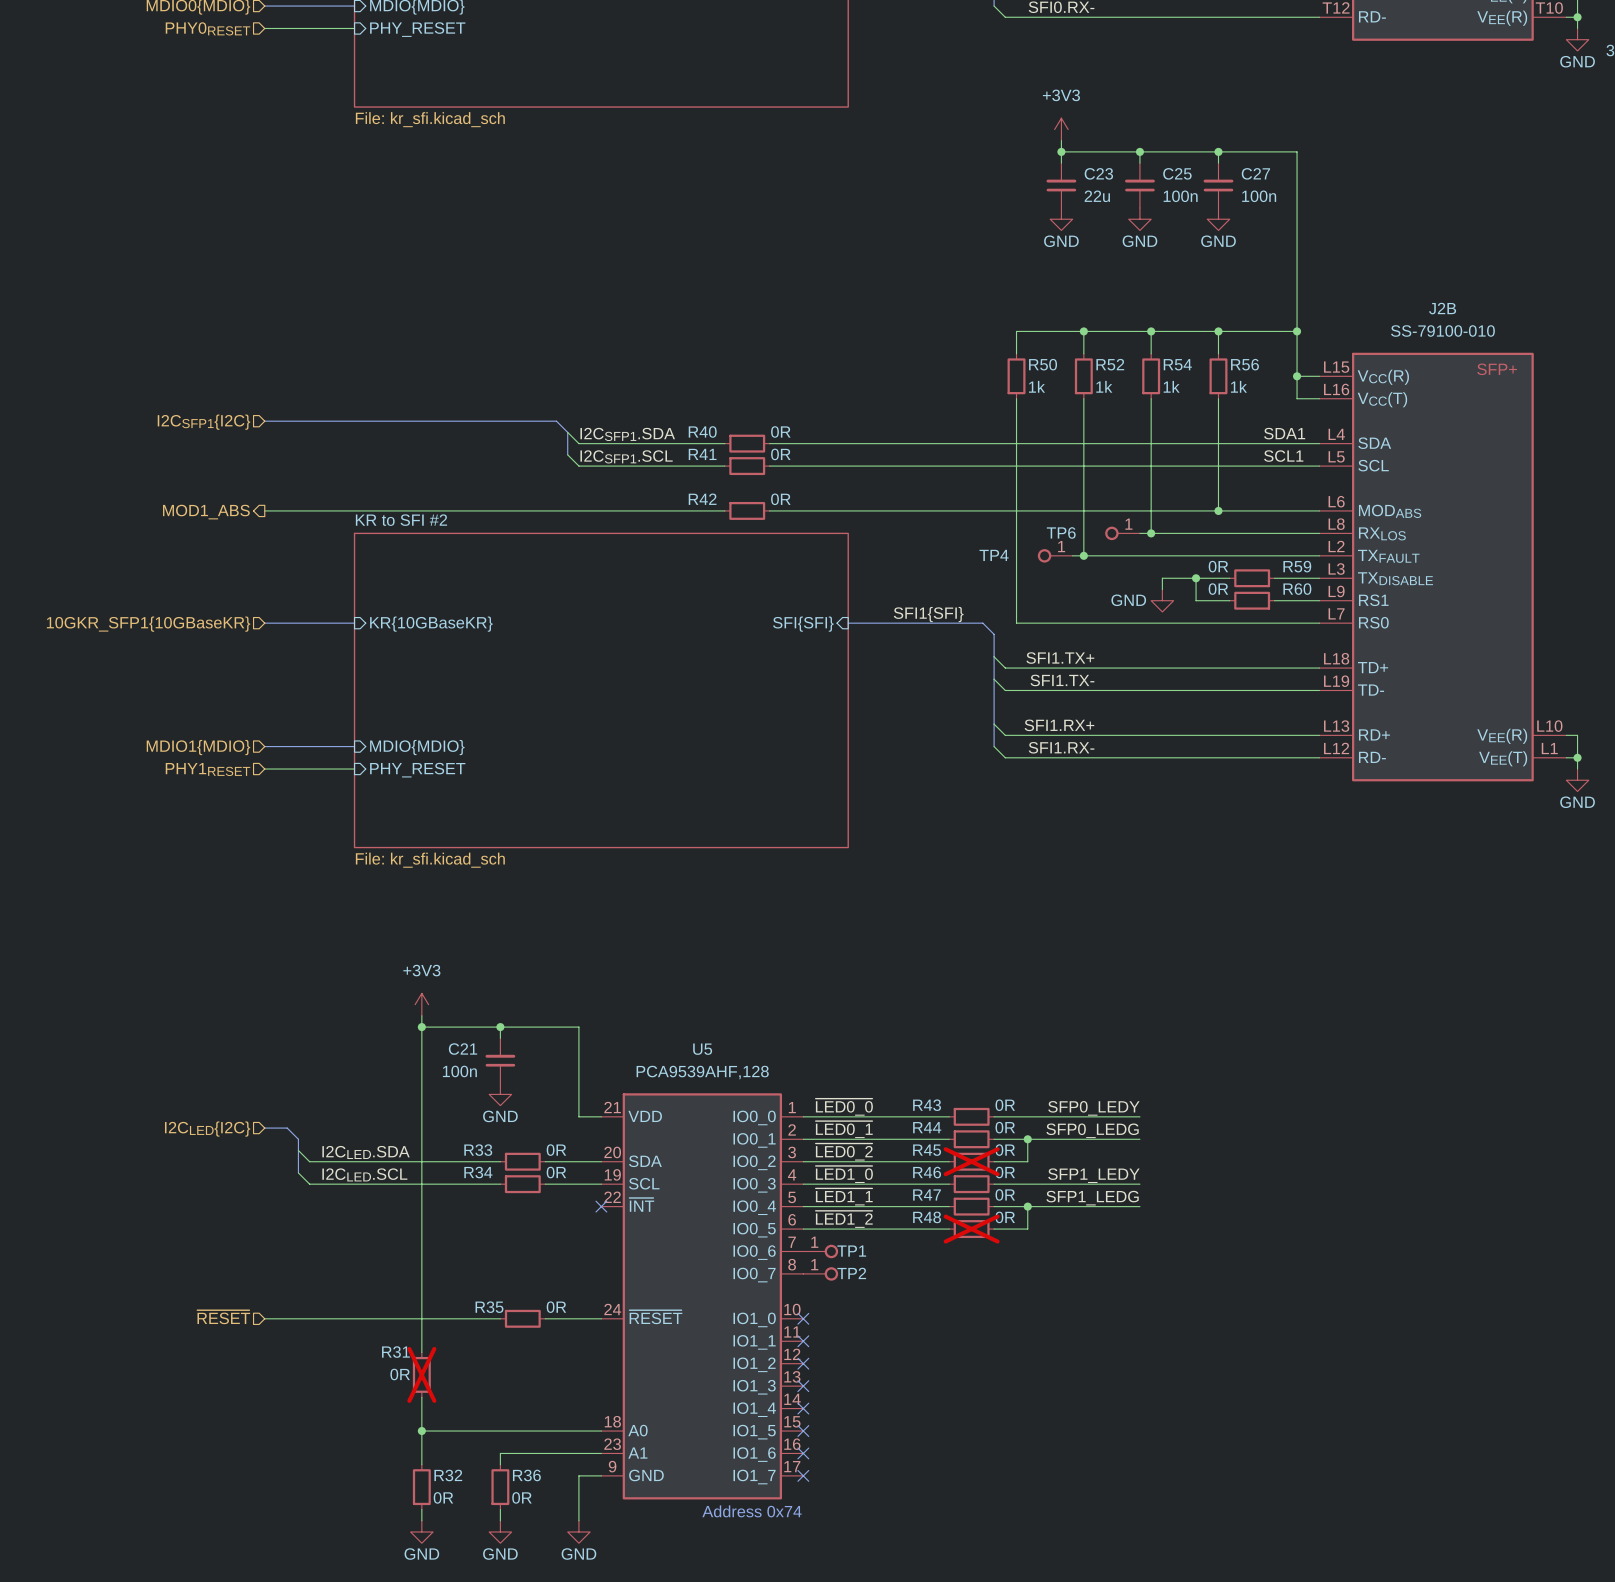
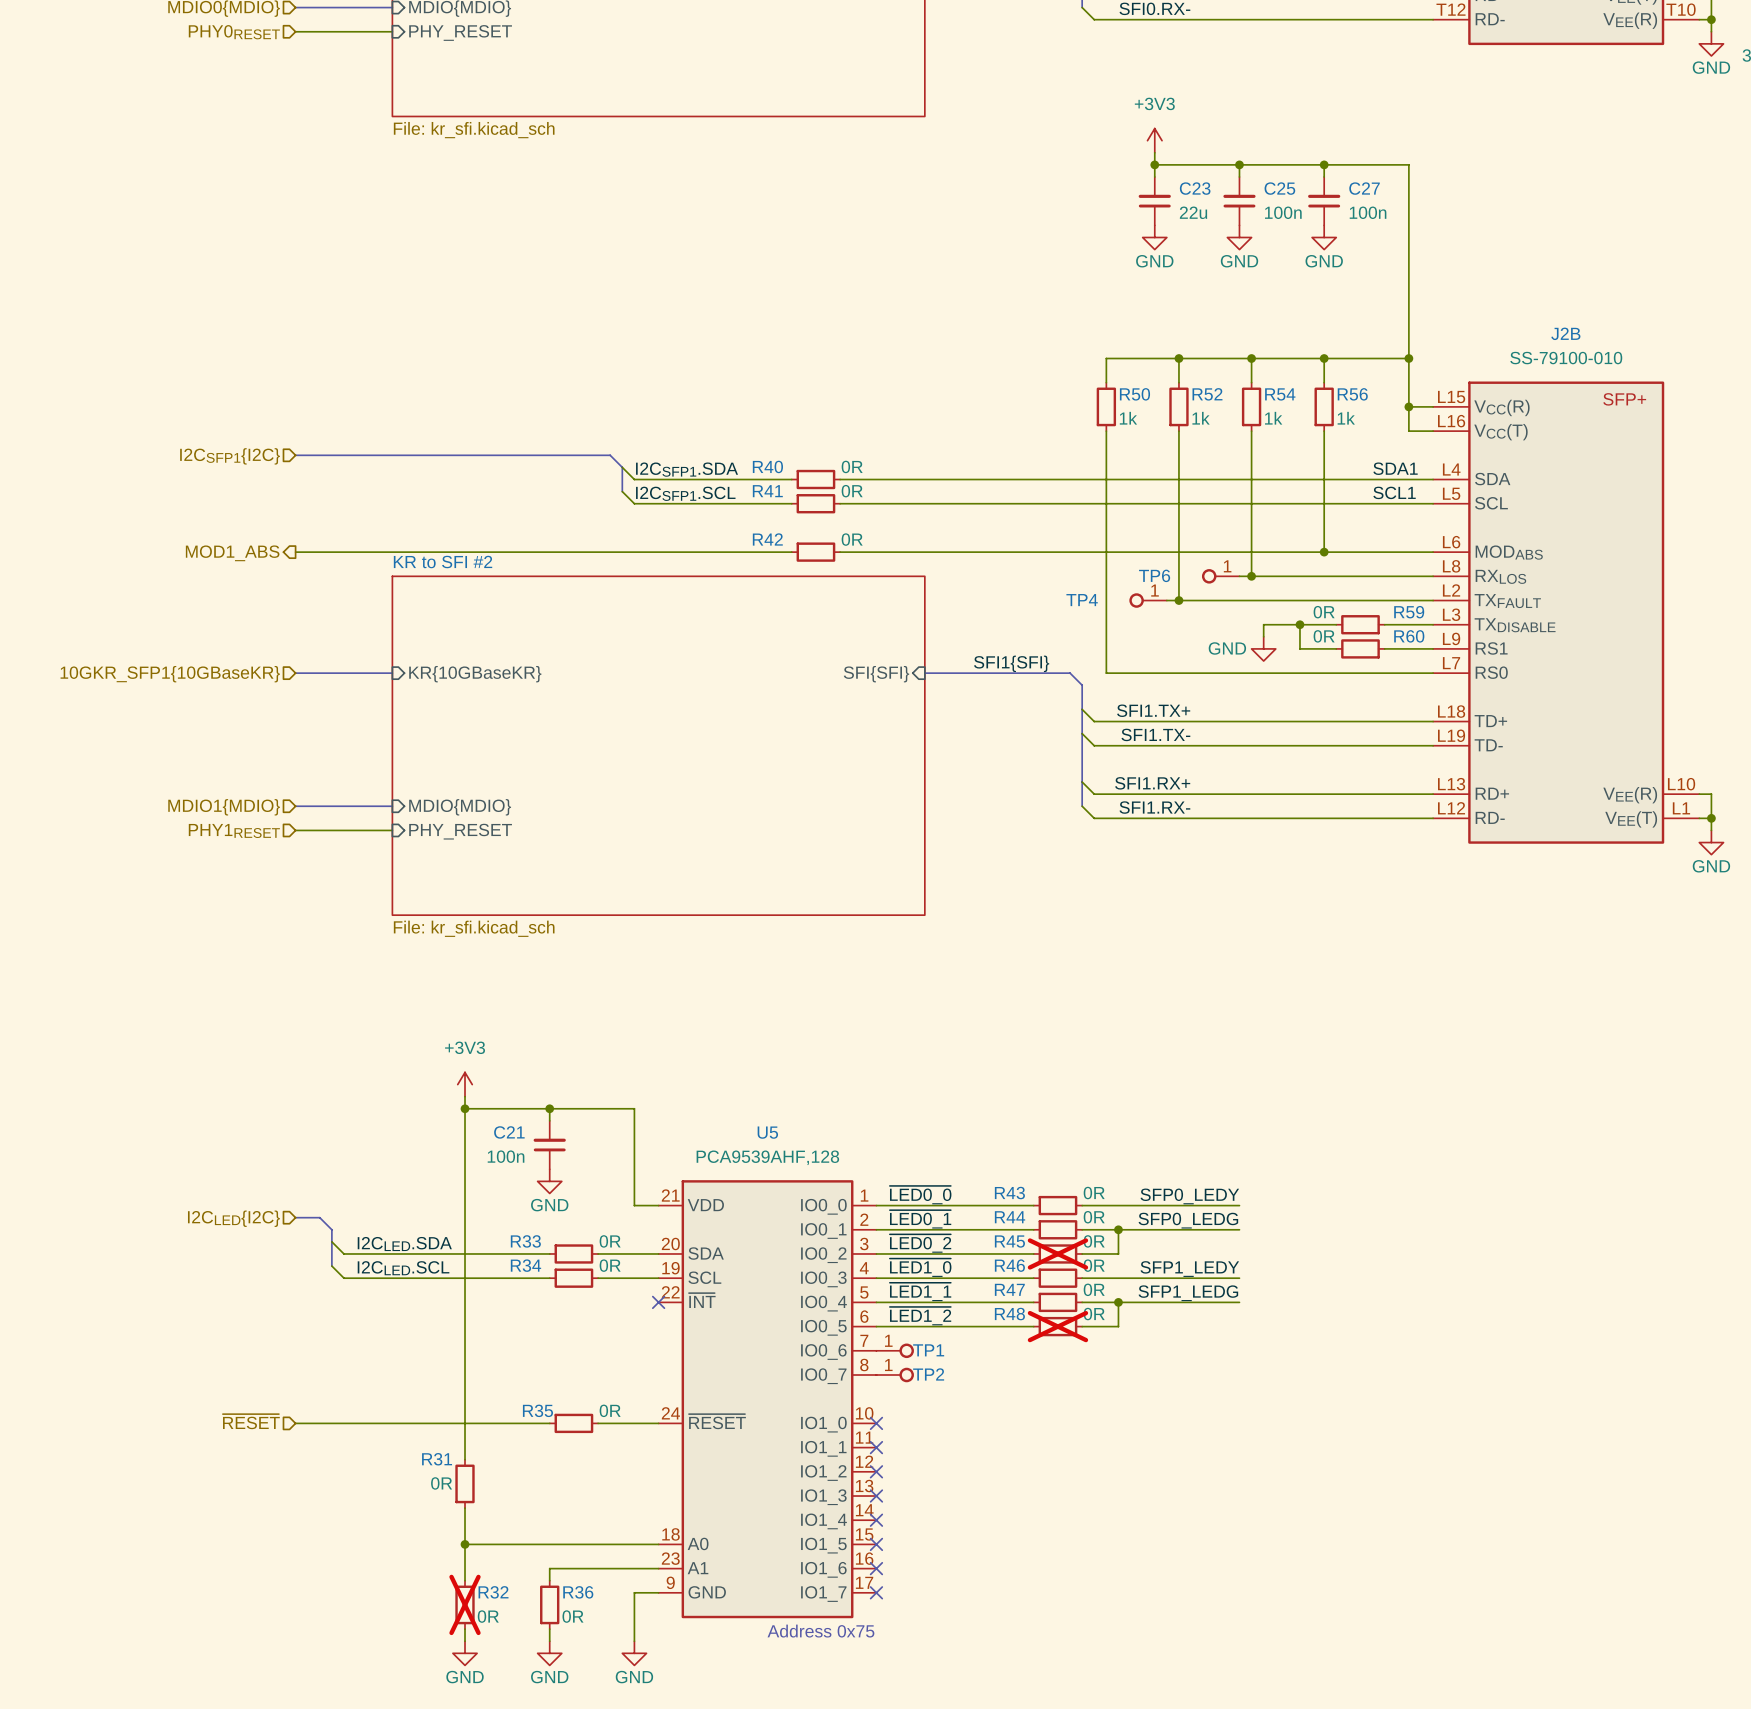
R31 do-not-place cross: (421, 1374) -> none
R32 do-not-place cross: none -> (465, 1604)
text: Address 0x74 (752, 1511) -> Address 0x75 (820, 1631)

